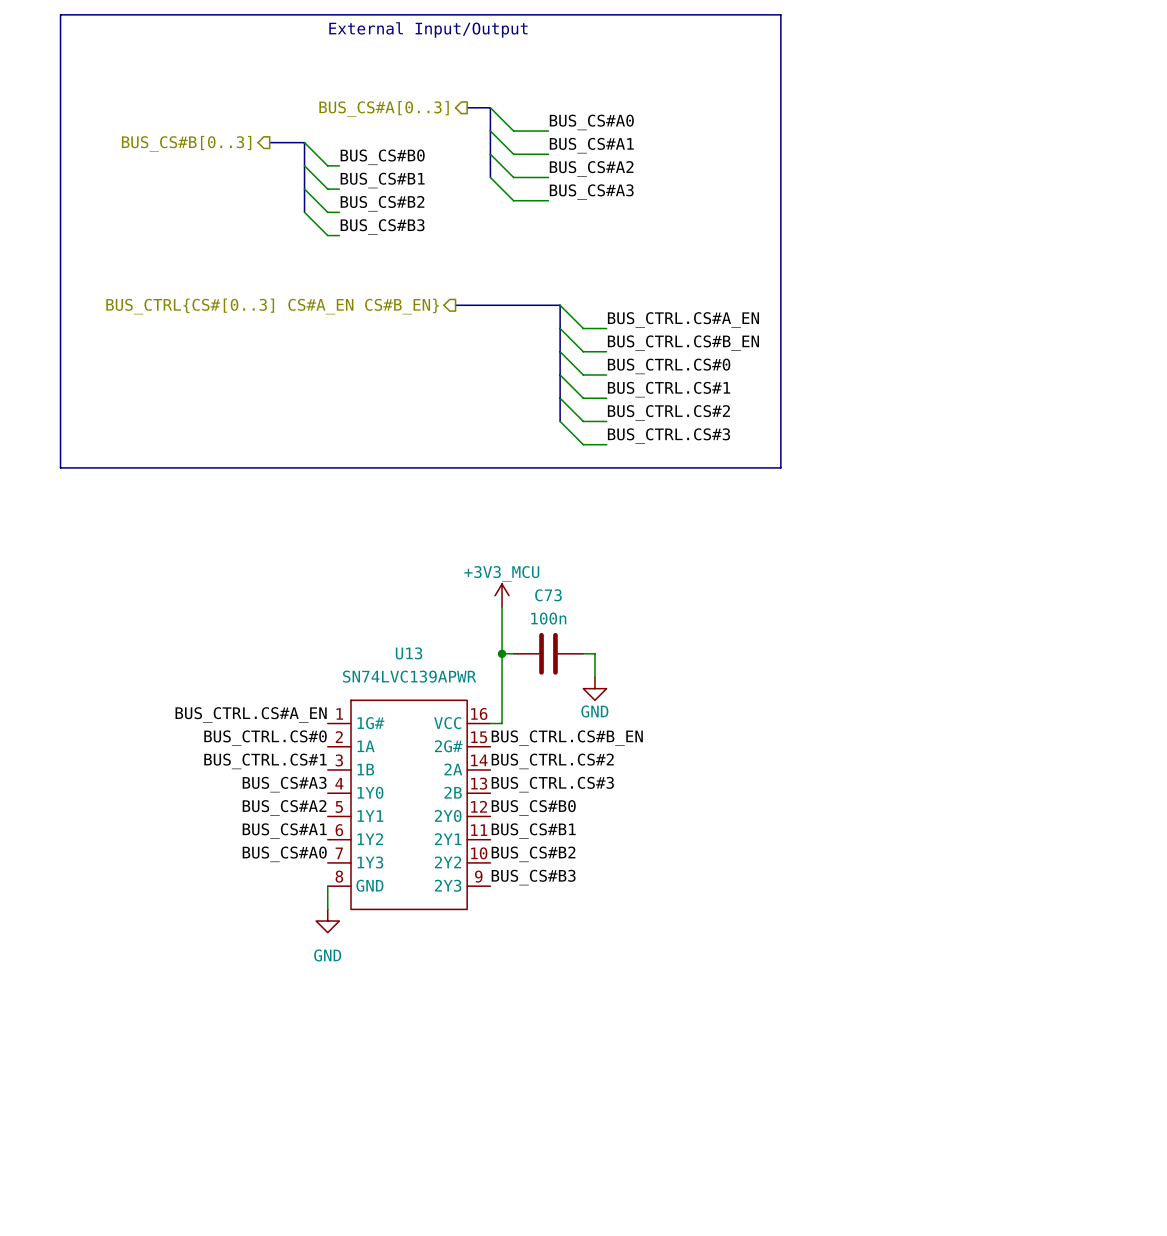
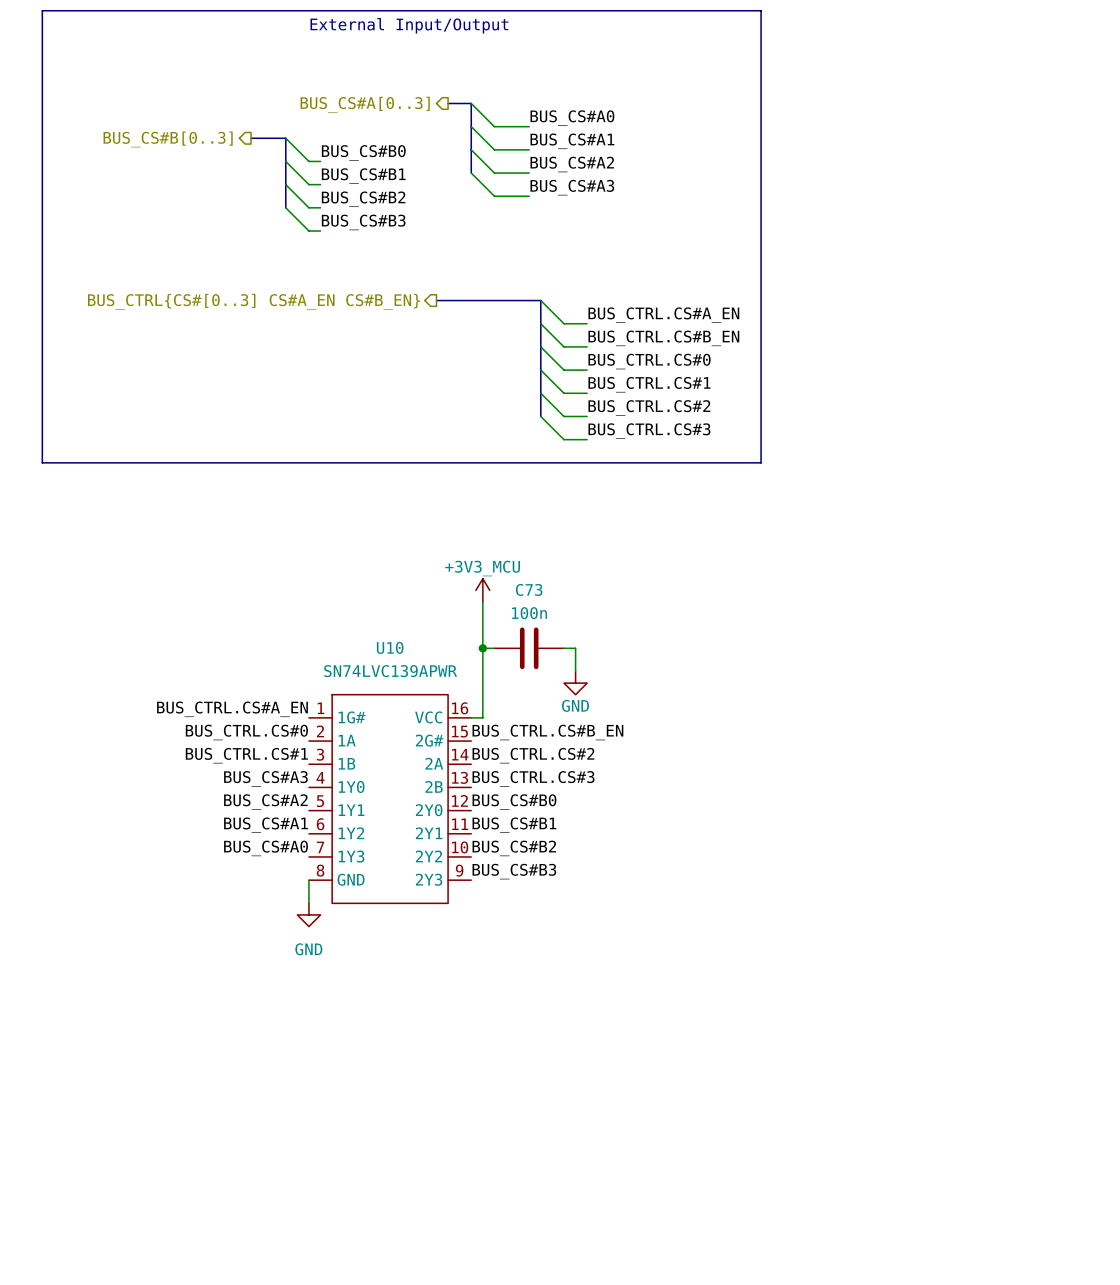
U13 name: U13 (409, 653) -> U10 (390, 647)

